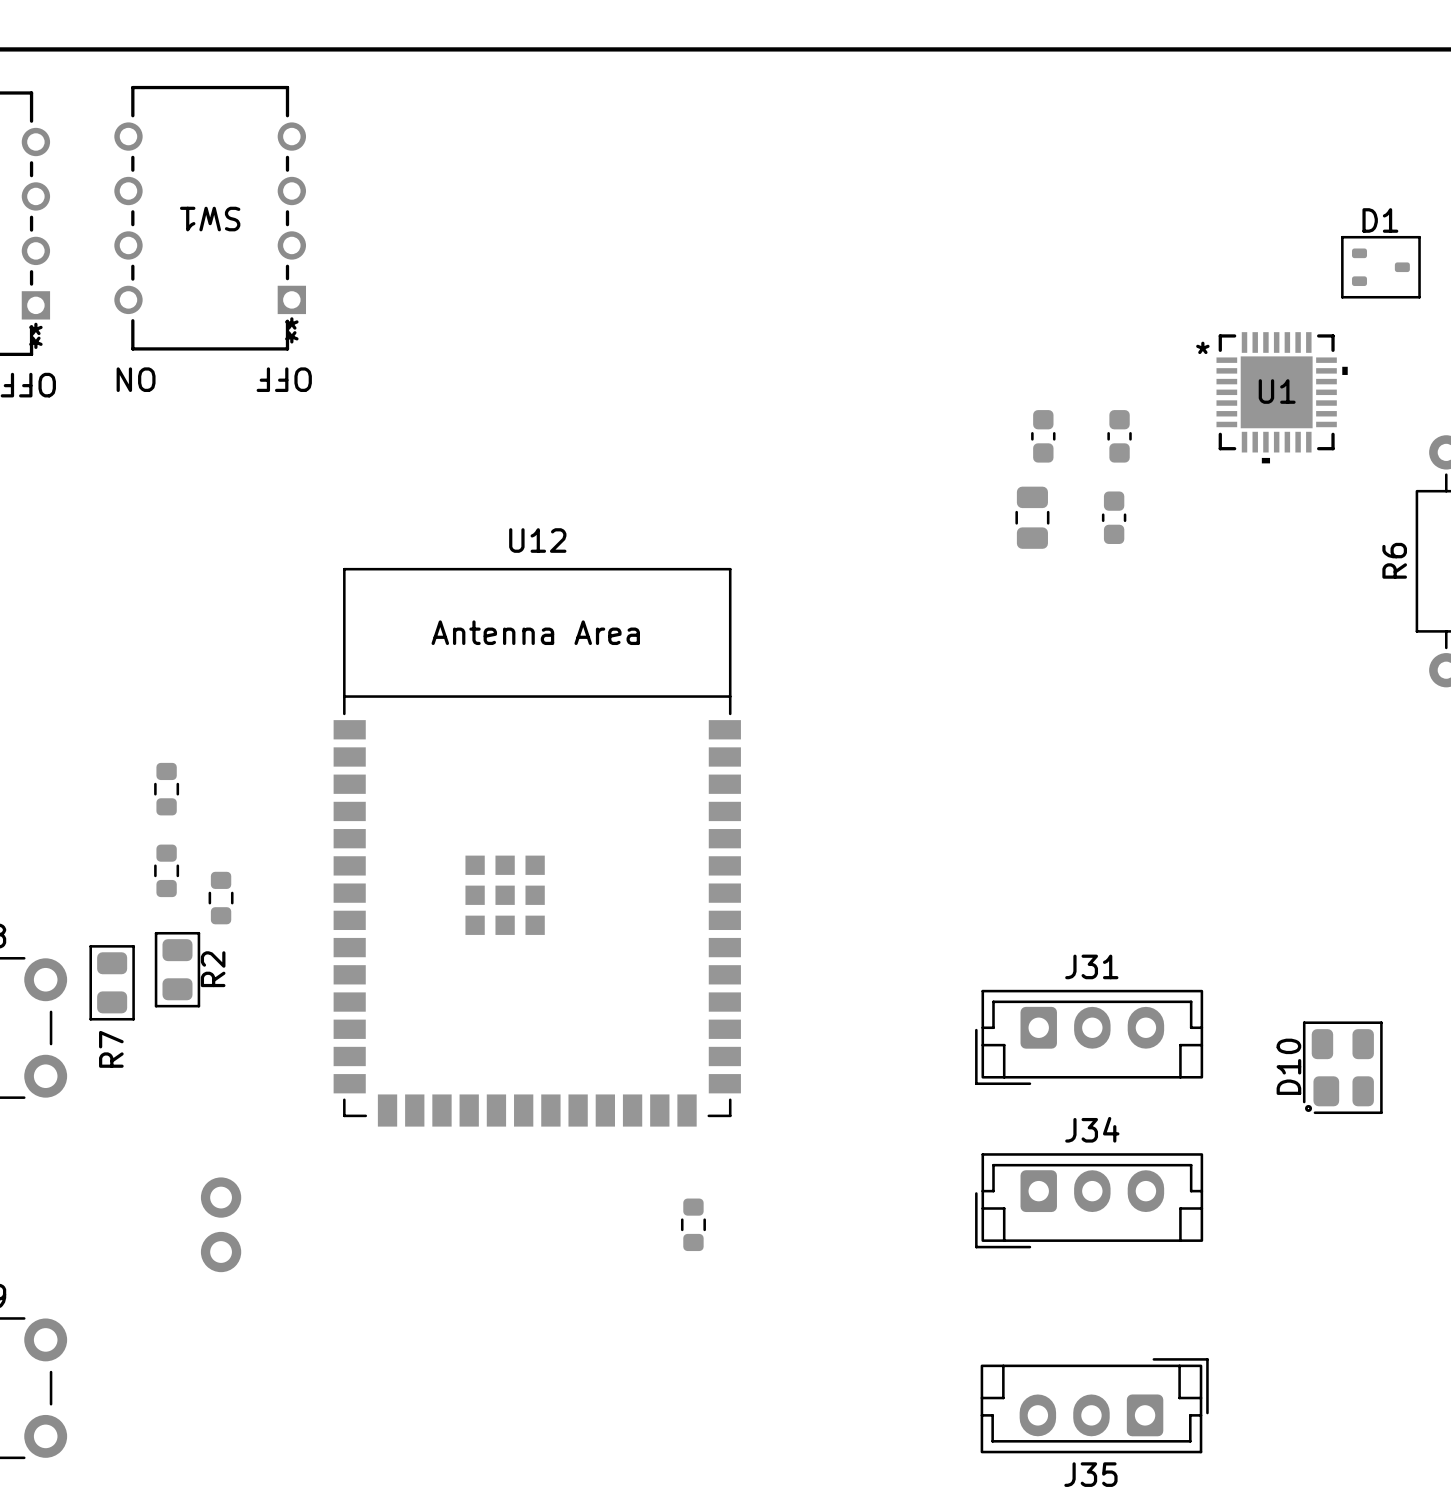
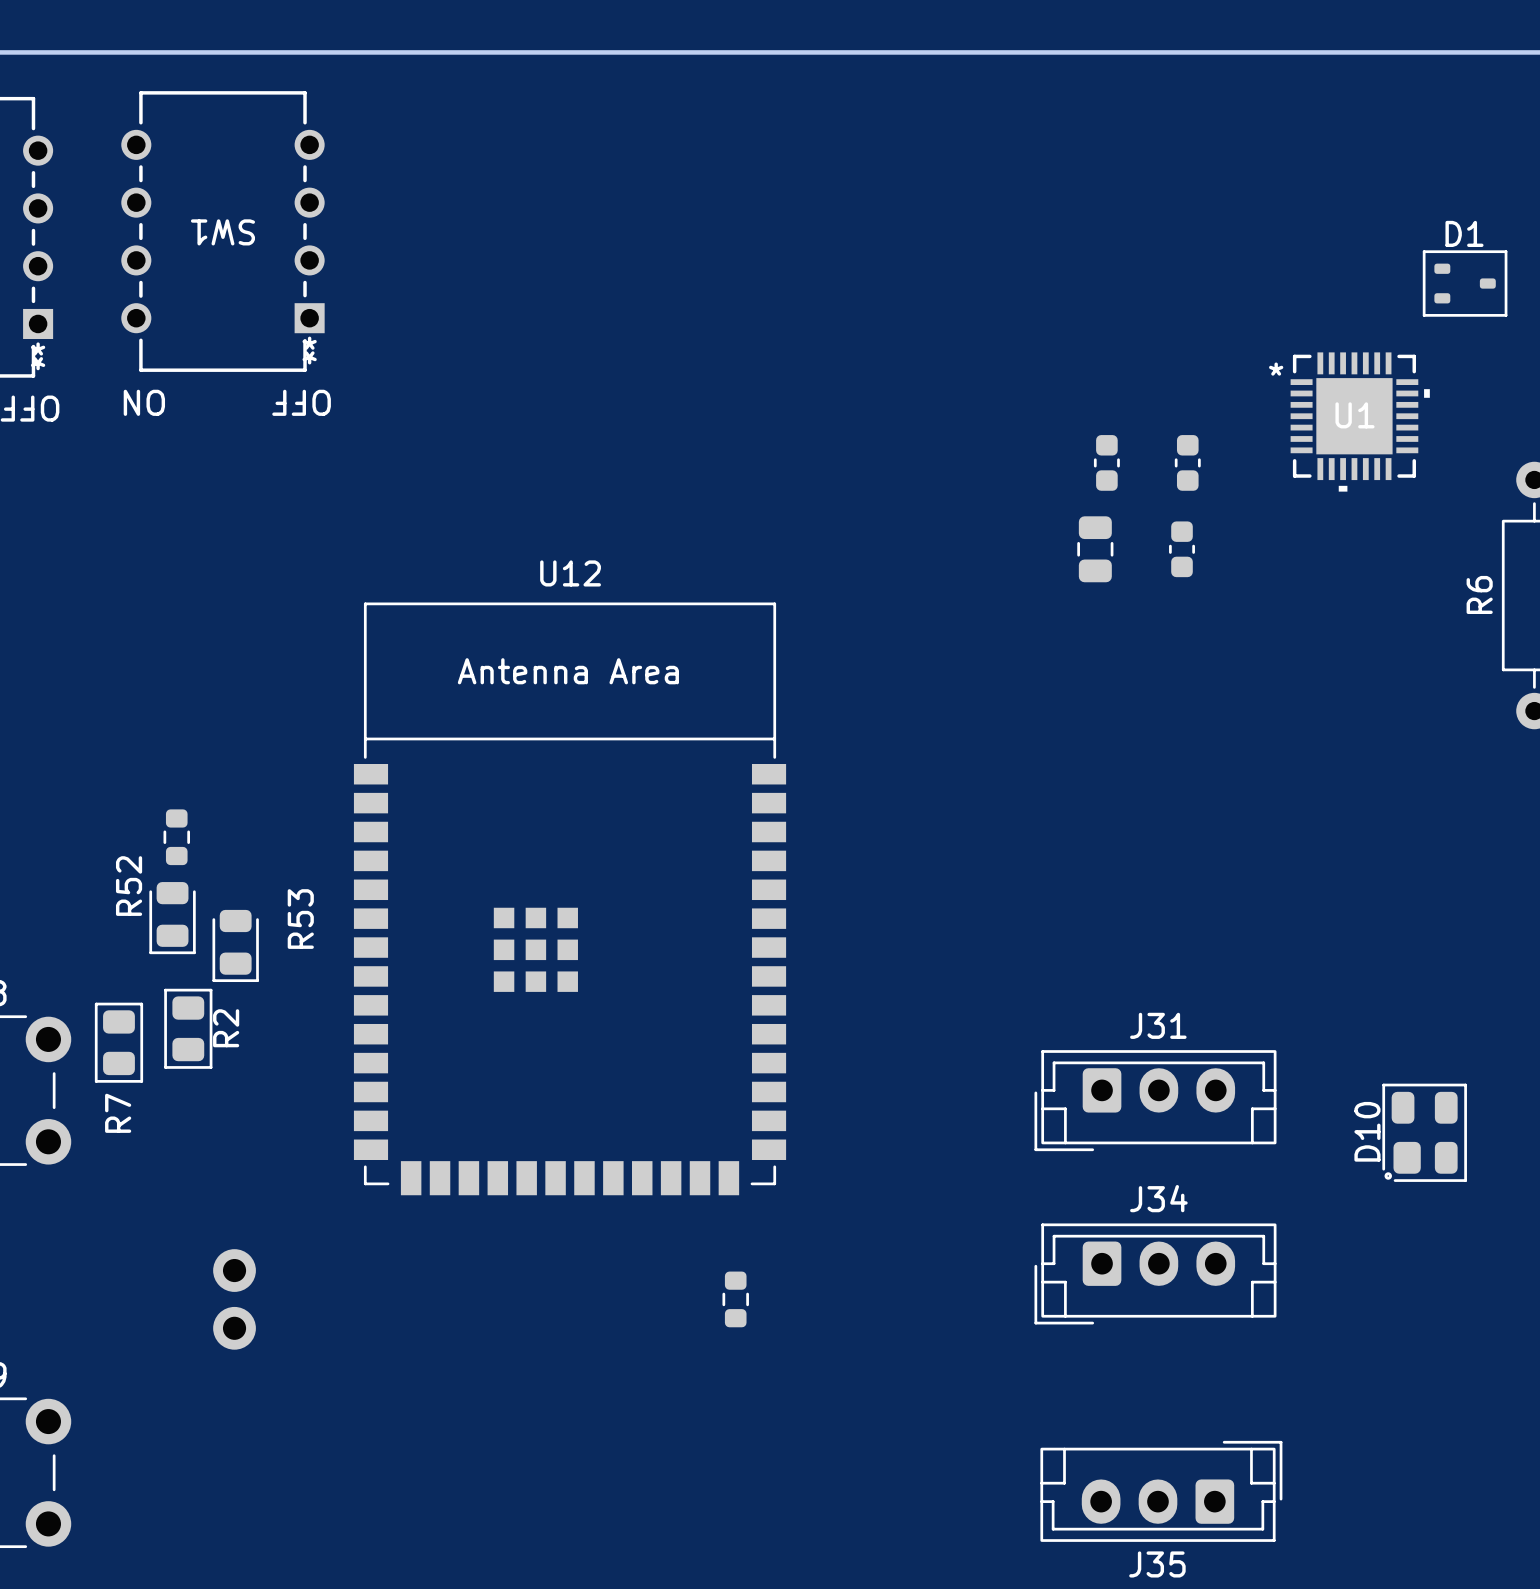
R52: none -> (172, 918)
part: (166, 870) -> none
R53: none -> (235, 945)
part: (221, 898) -> none

